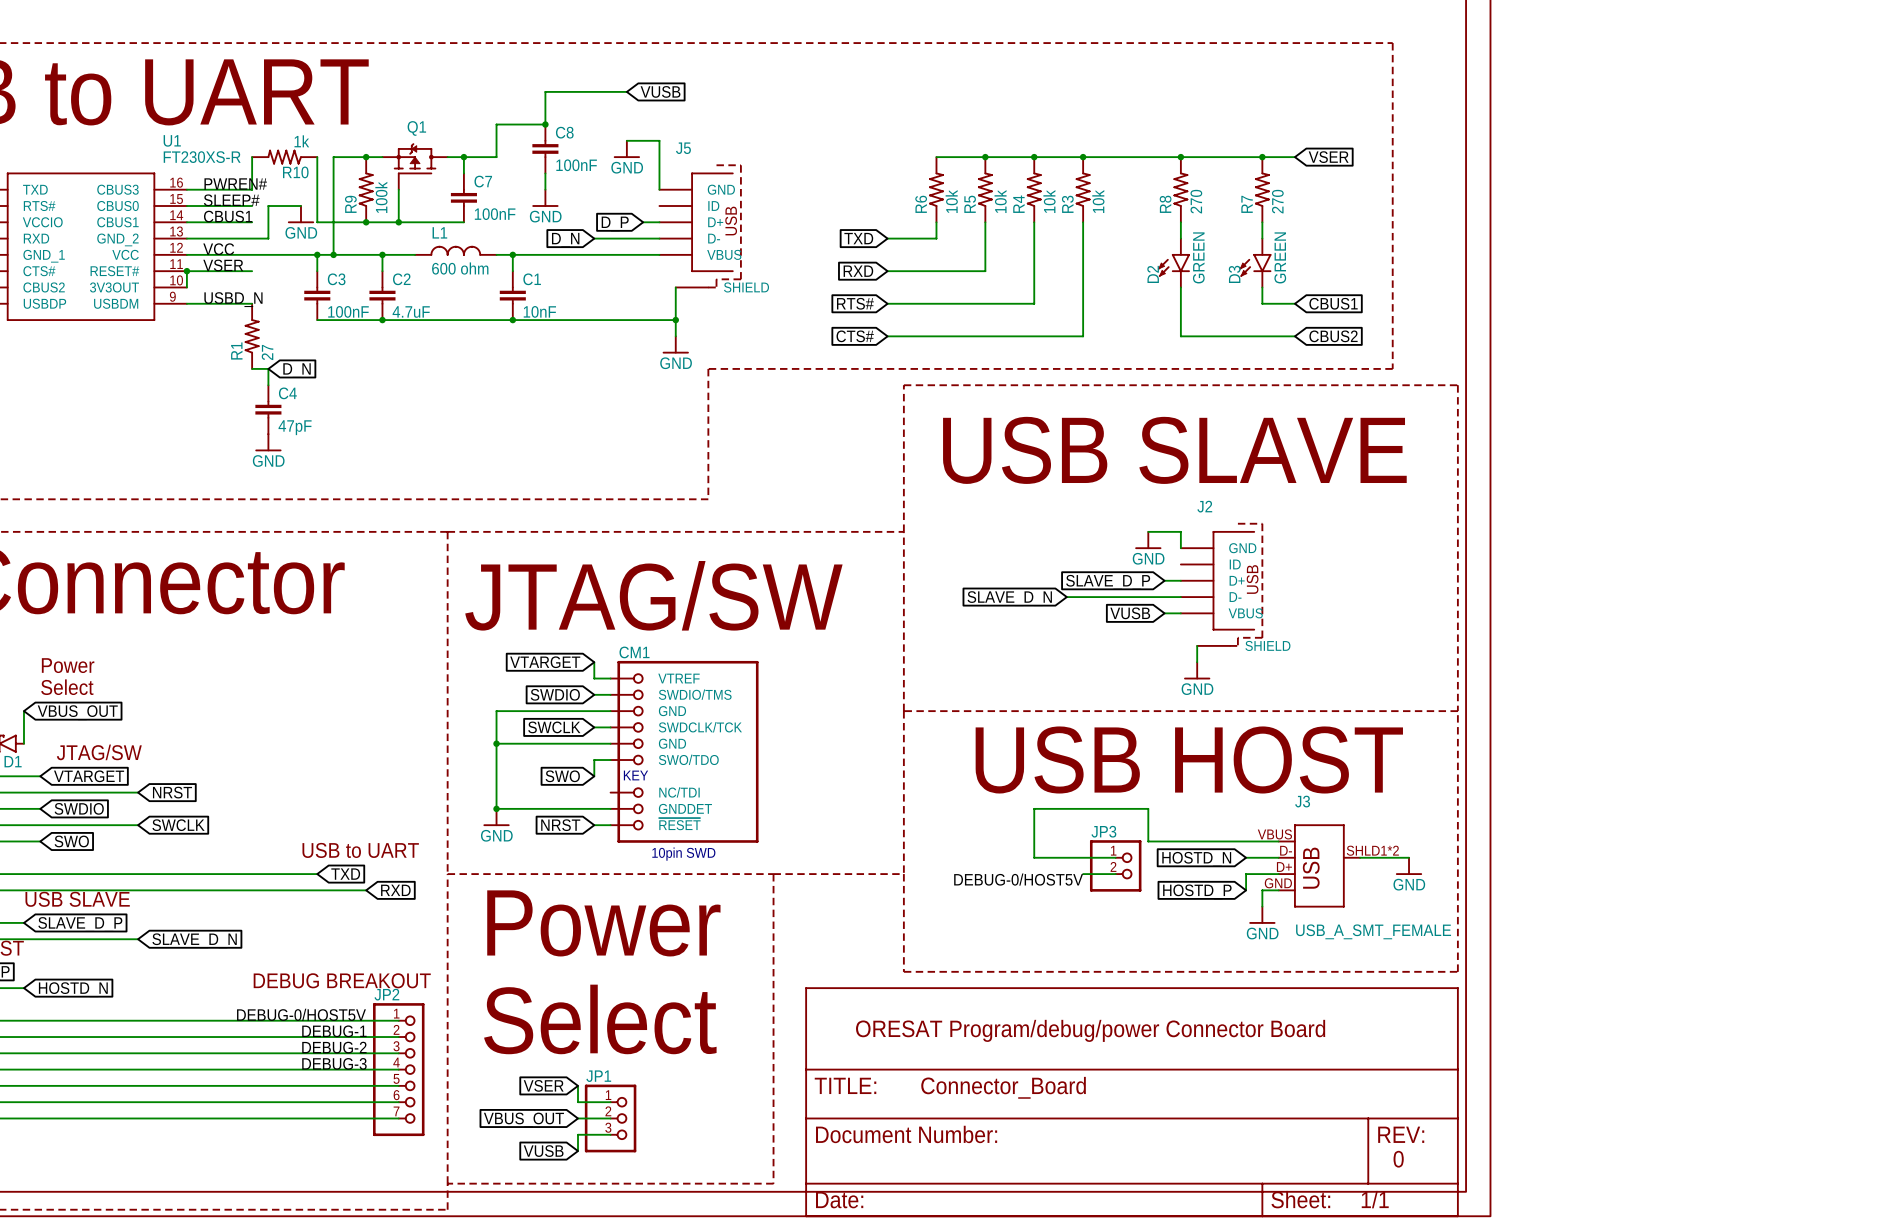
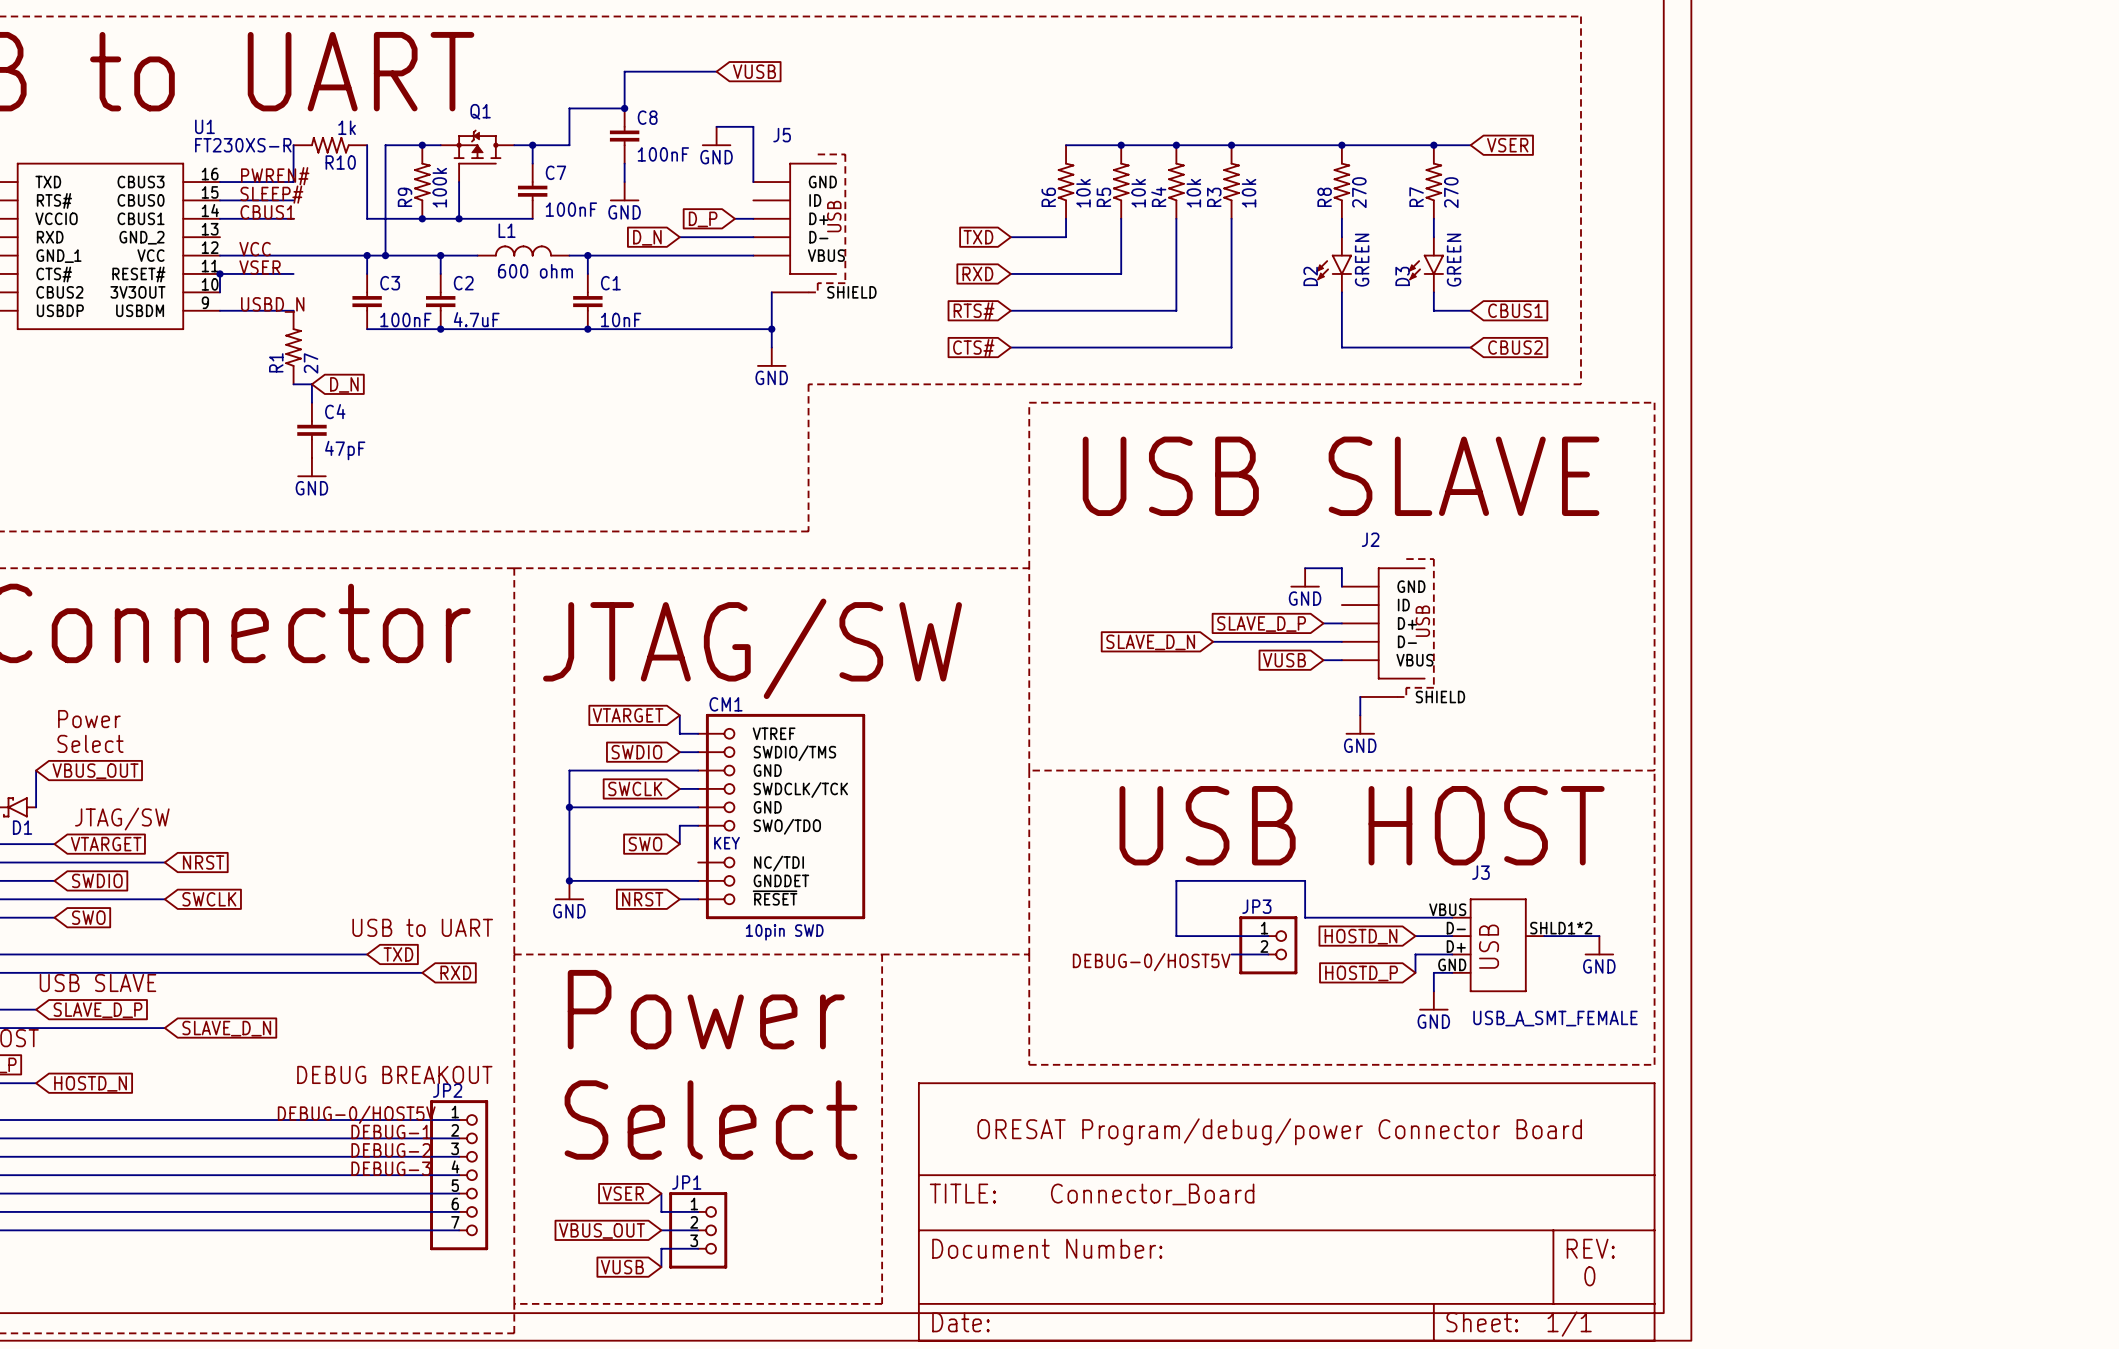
wire: (300, 206) (268, 206) (268, 238) (186, 238) -> none
power symbol: GND (300, 214) -> none

